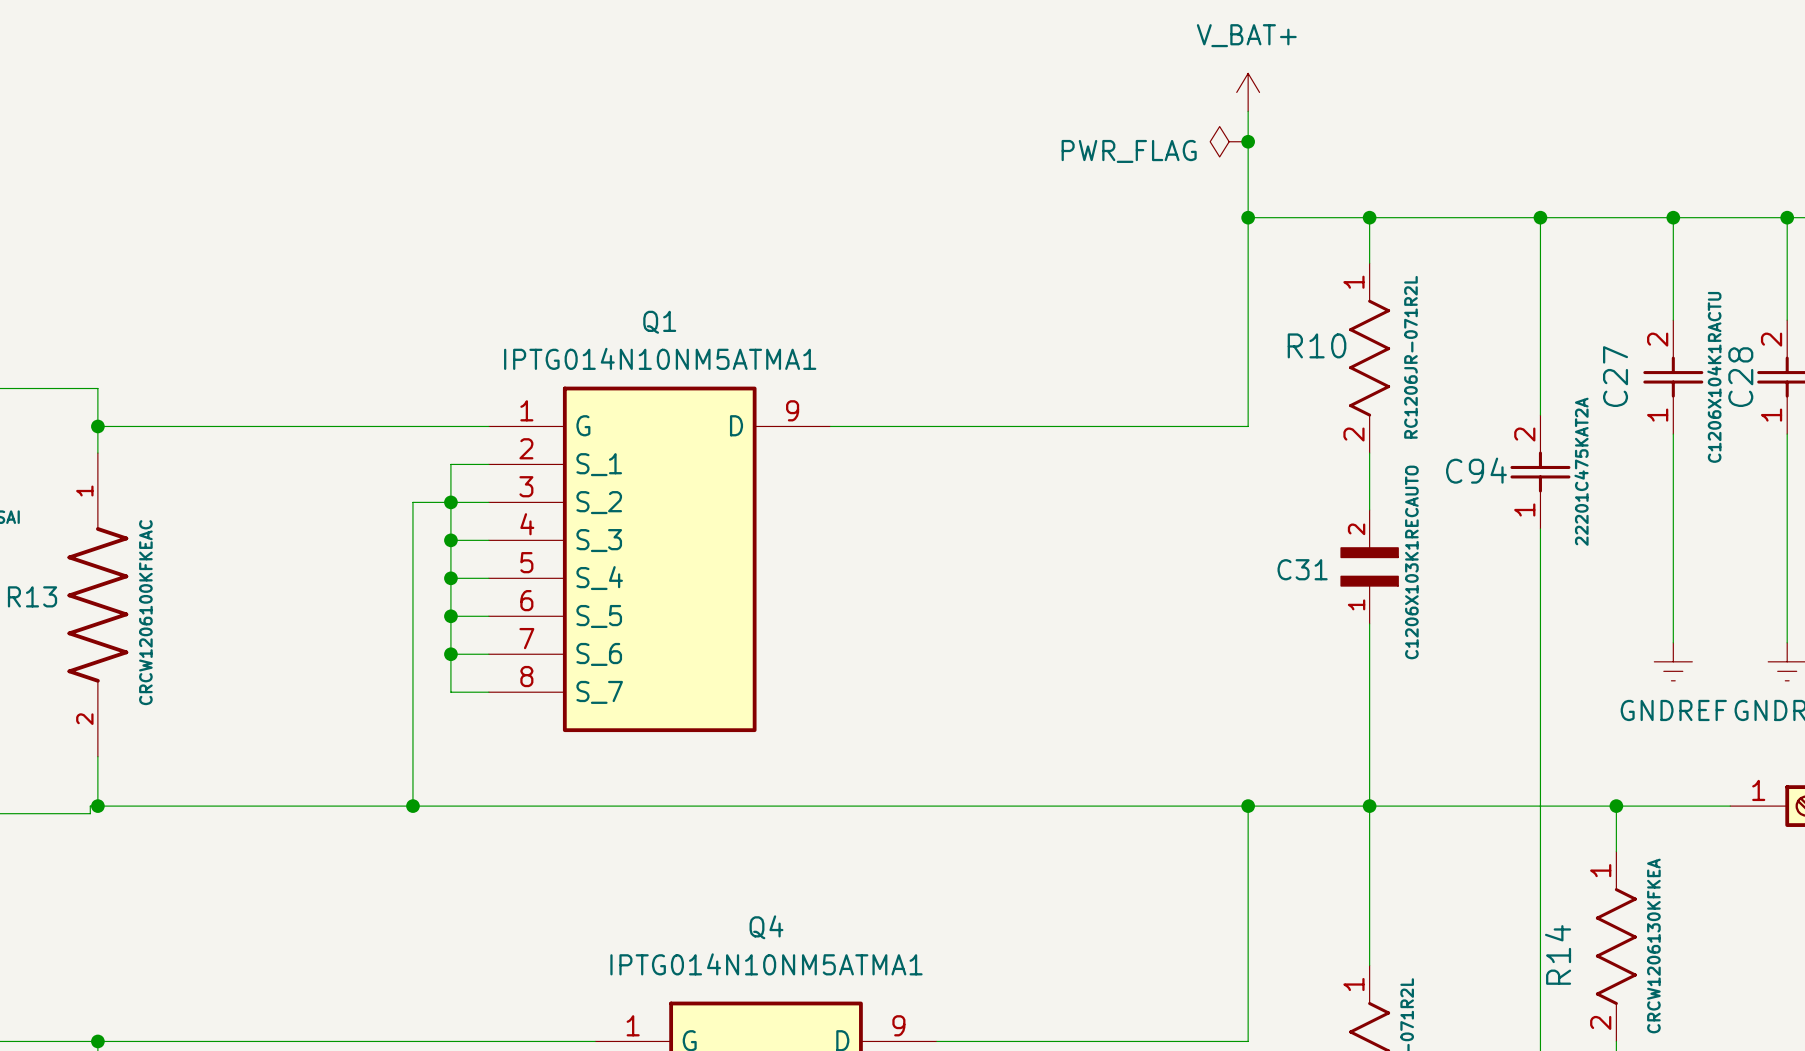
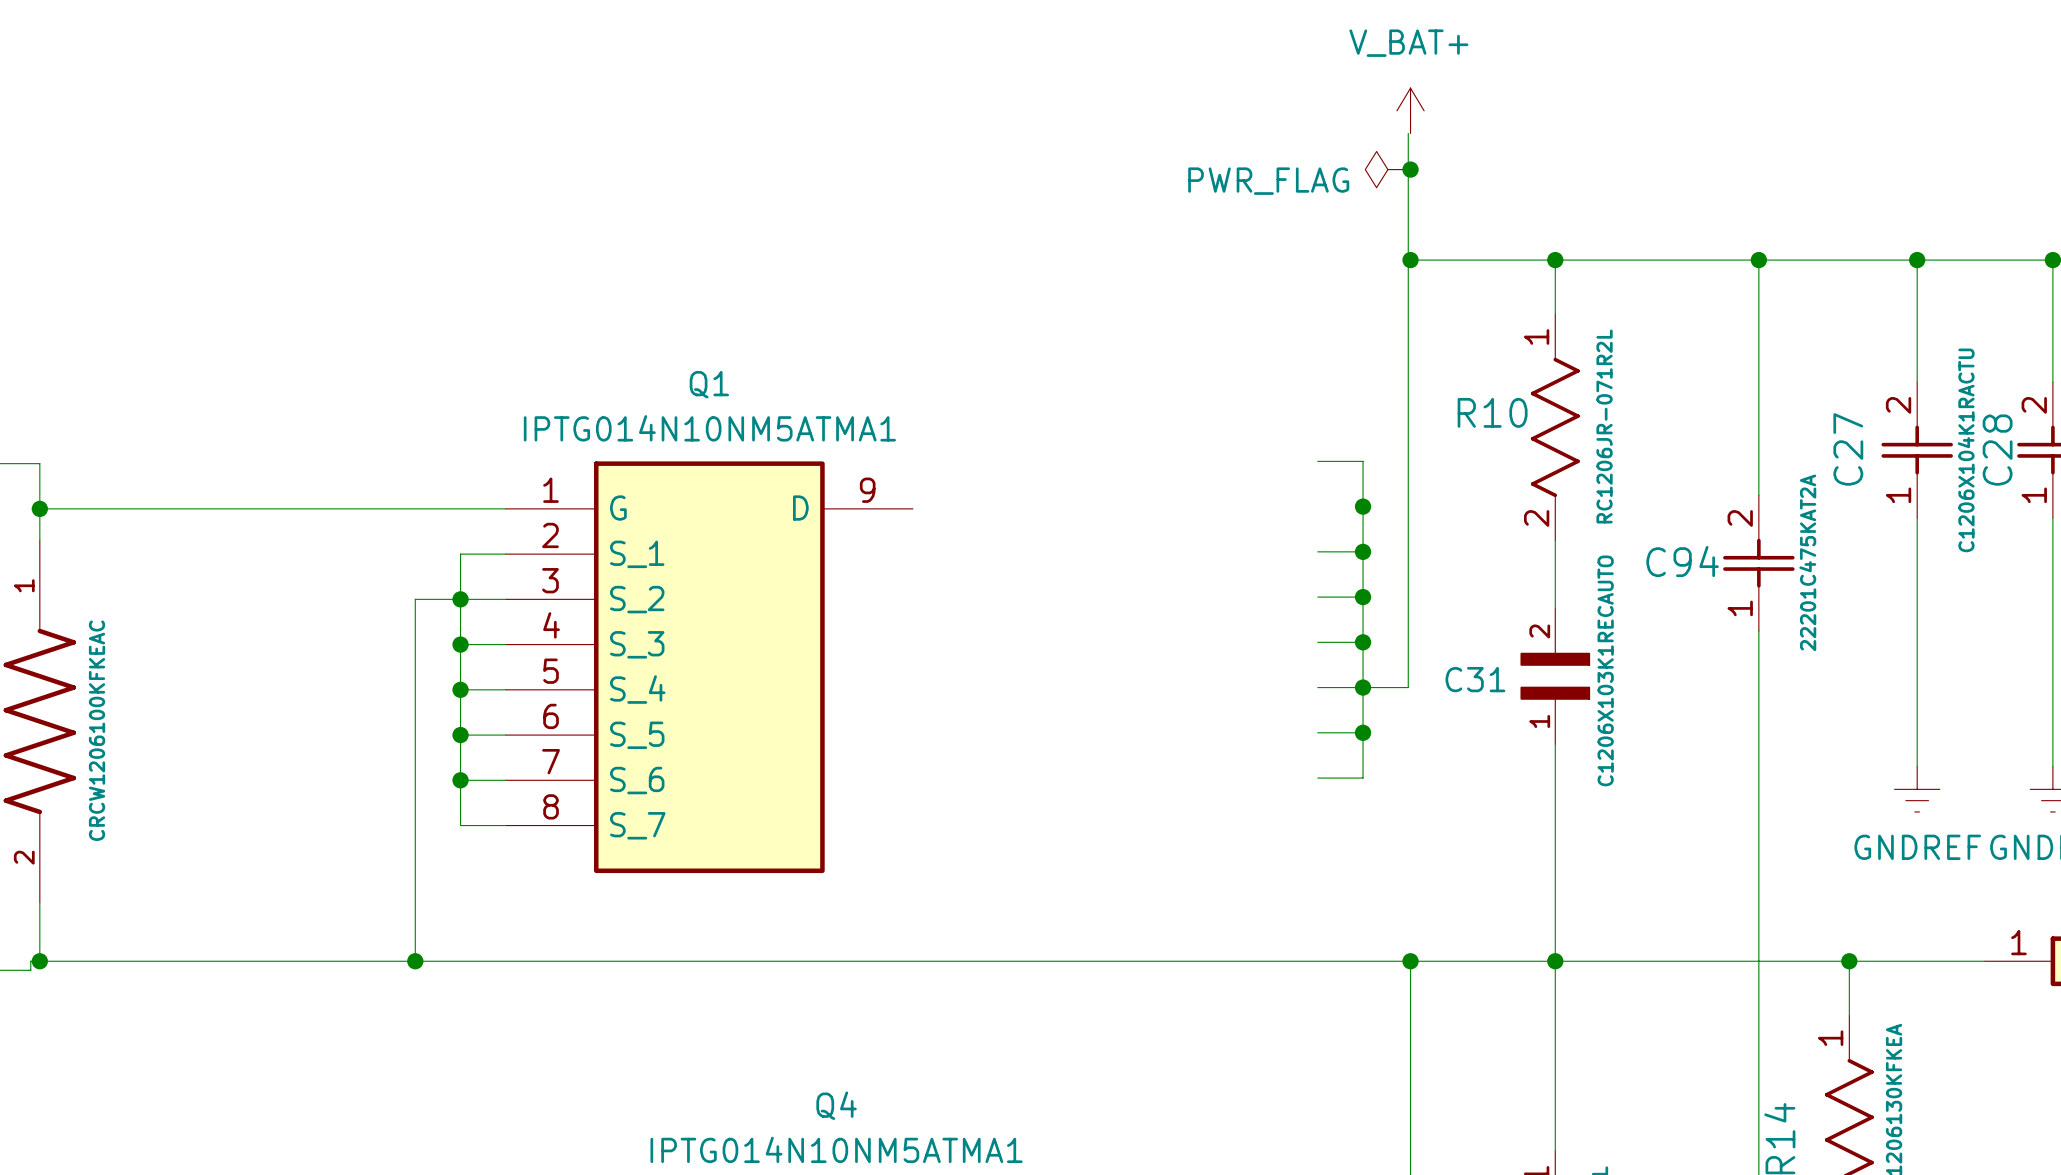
wire: none -> (1408, 133) (1408, 687) (1317, 687)
wire: (1248, 111) (1248, 426) (830, 426) -> none
wire: none -> (1317, 461) (1363, 461) (1363, 778) (1317, 778)
junction: none -> (1363, 506)
wire: none -> (1317, 551) (1363, 551)
junction: none -> (1363, 551)
wire: none -> (1317, 597) (1363, 597)
junction: none -> (1363, 597)
wire: none -> (1317, 642) (1363, 642)
junction: none -> (1363, 642)
junction: none -> (1363, 687)
wire: none -> (1317, 732) (1363, 732)
junction: none -> (1363, 732)

